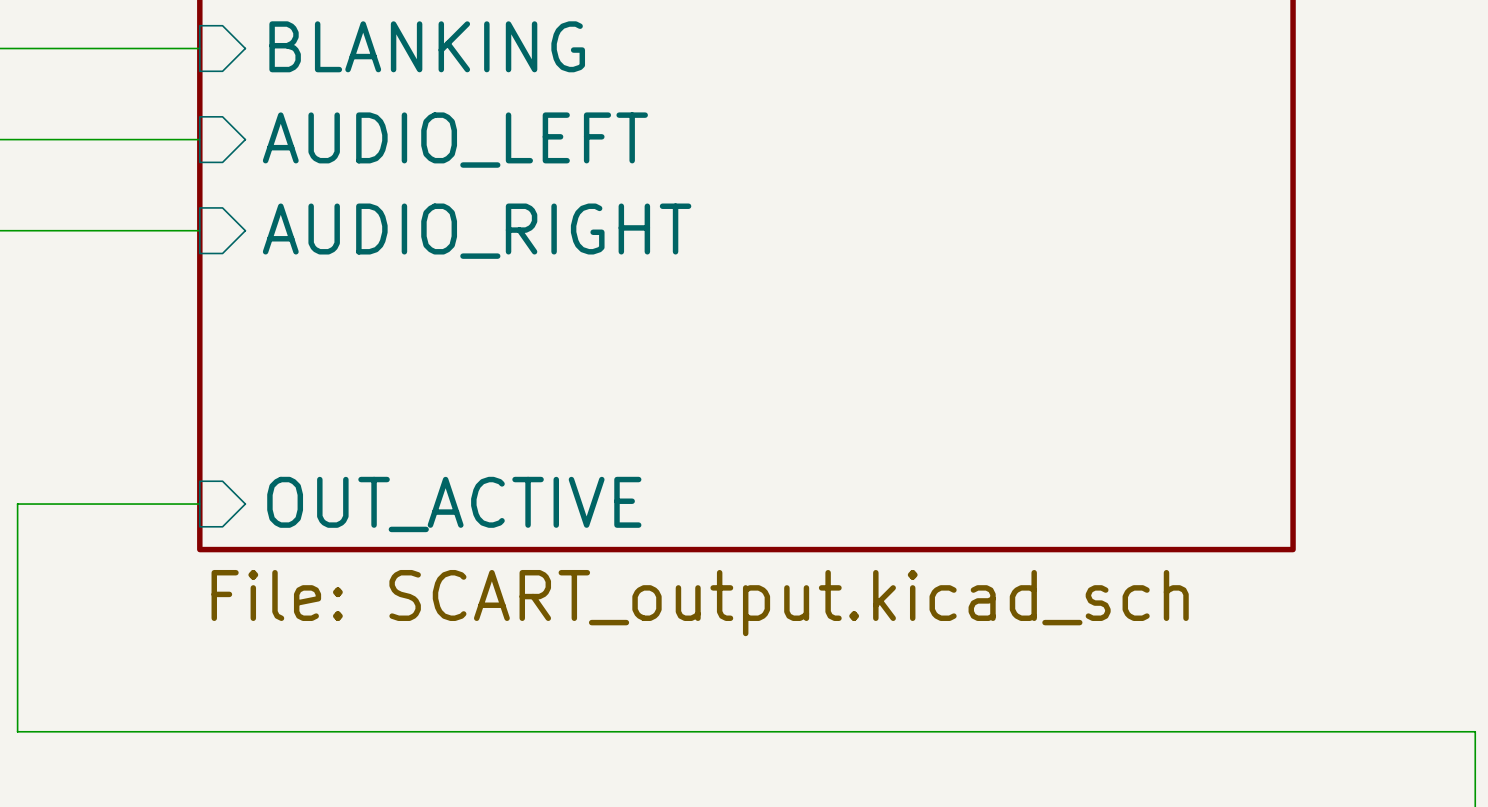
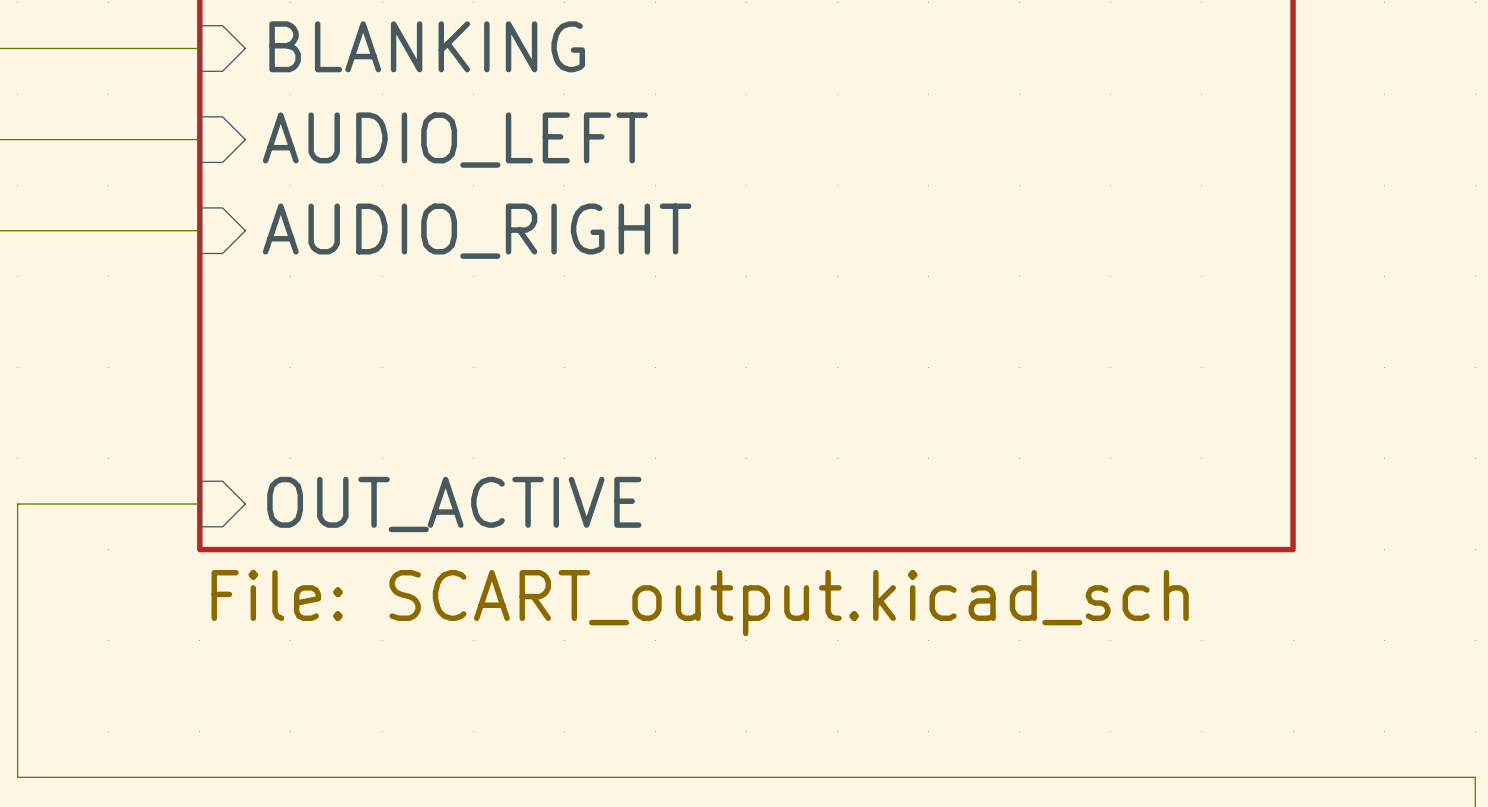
wire: (17, 731) (1475, 731) (1475, 777) -> (17, 731) (17, 777) (1475, 777)

